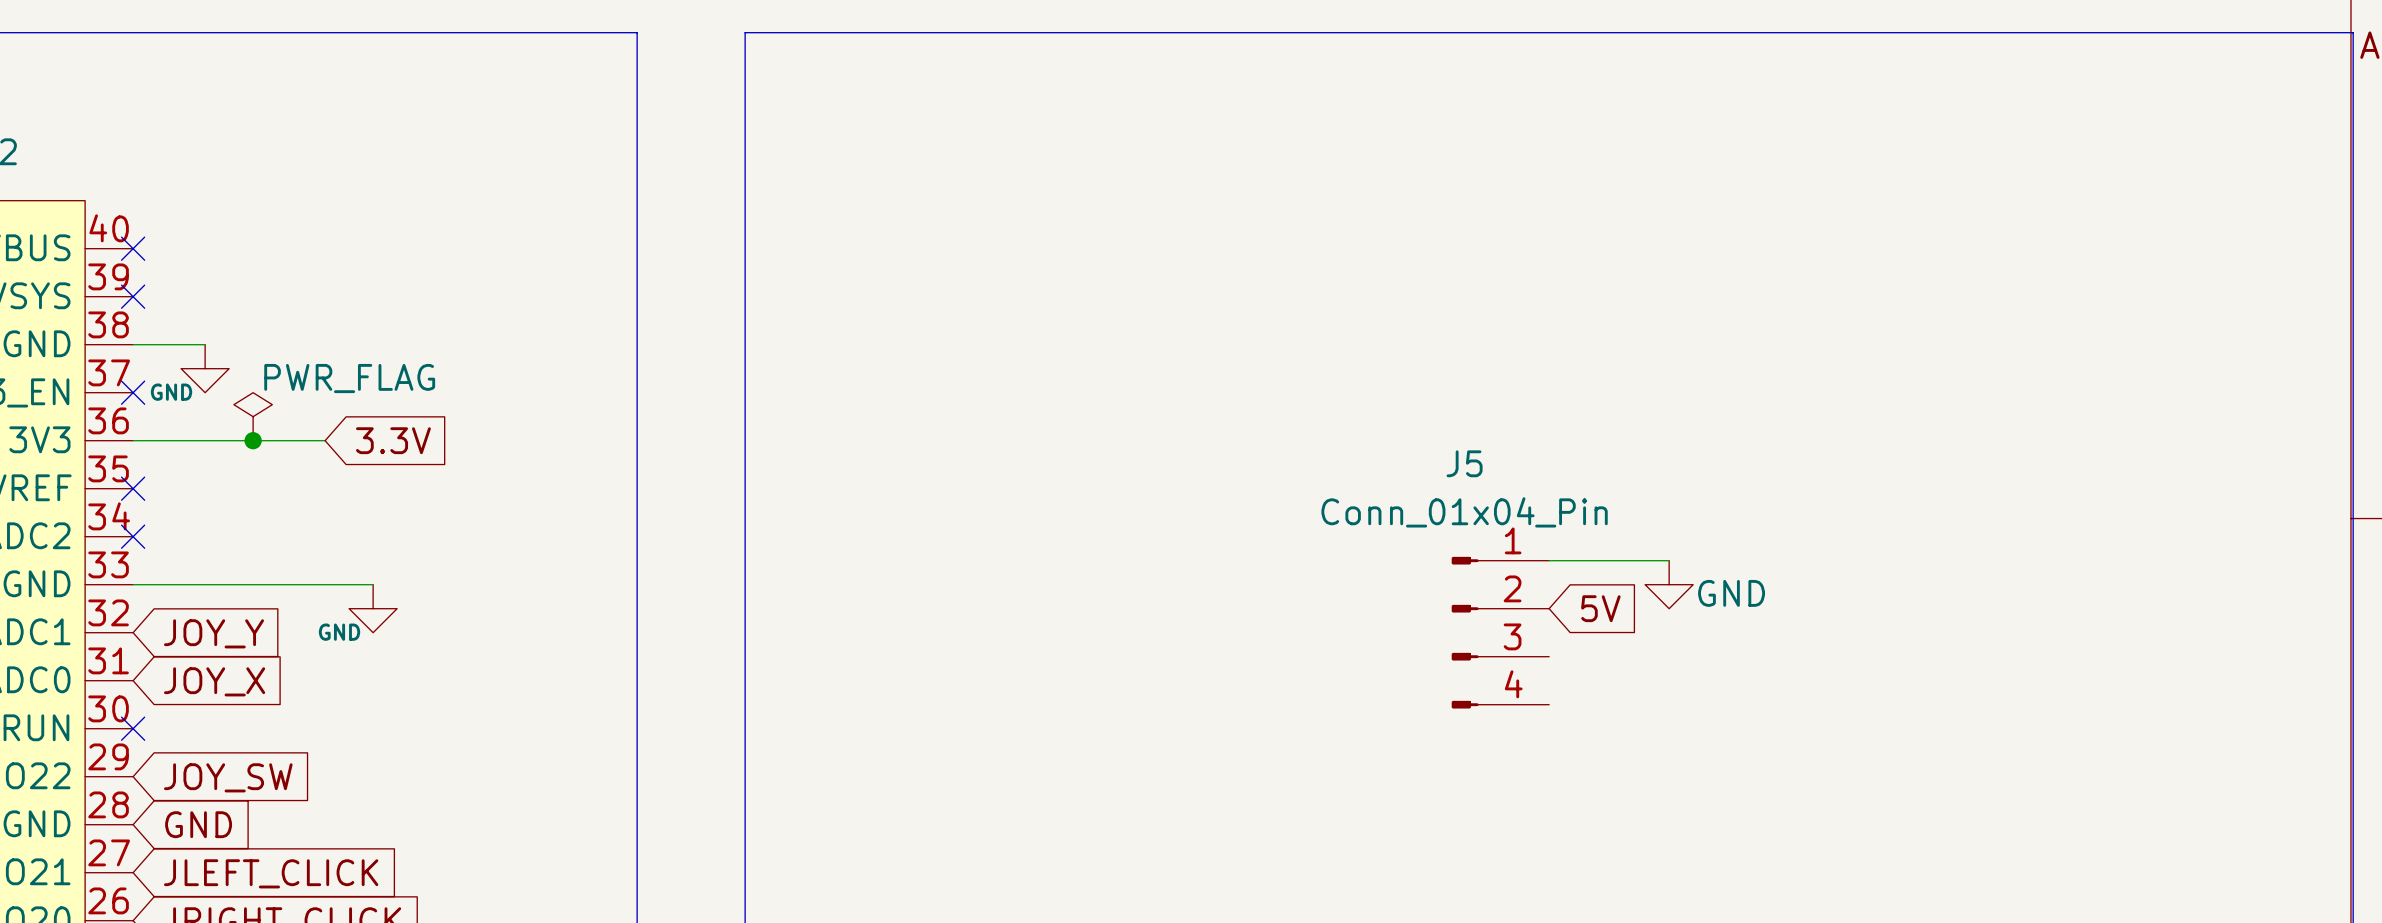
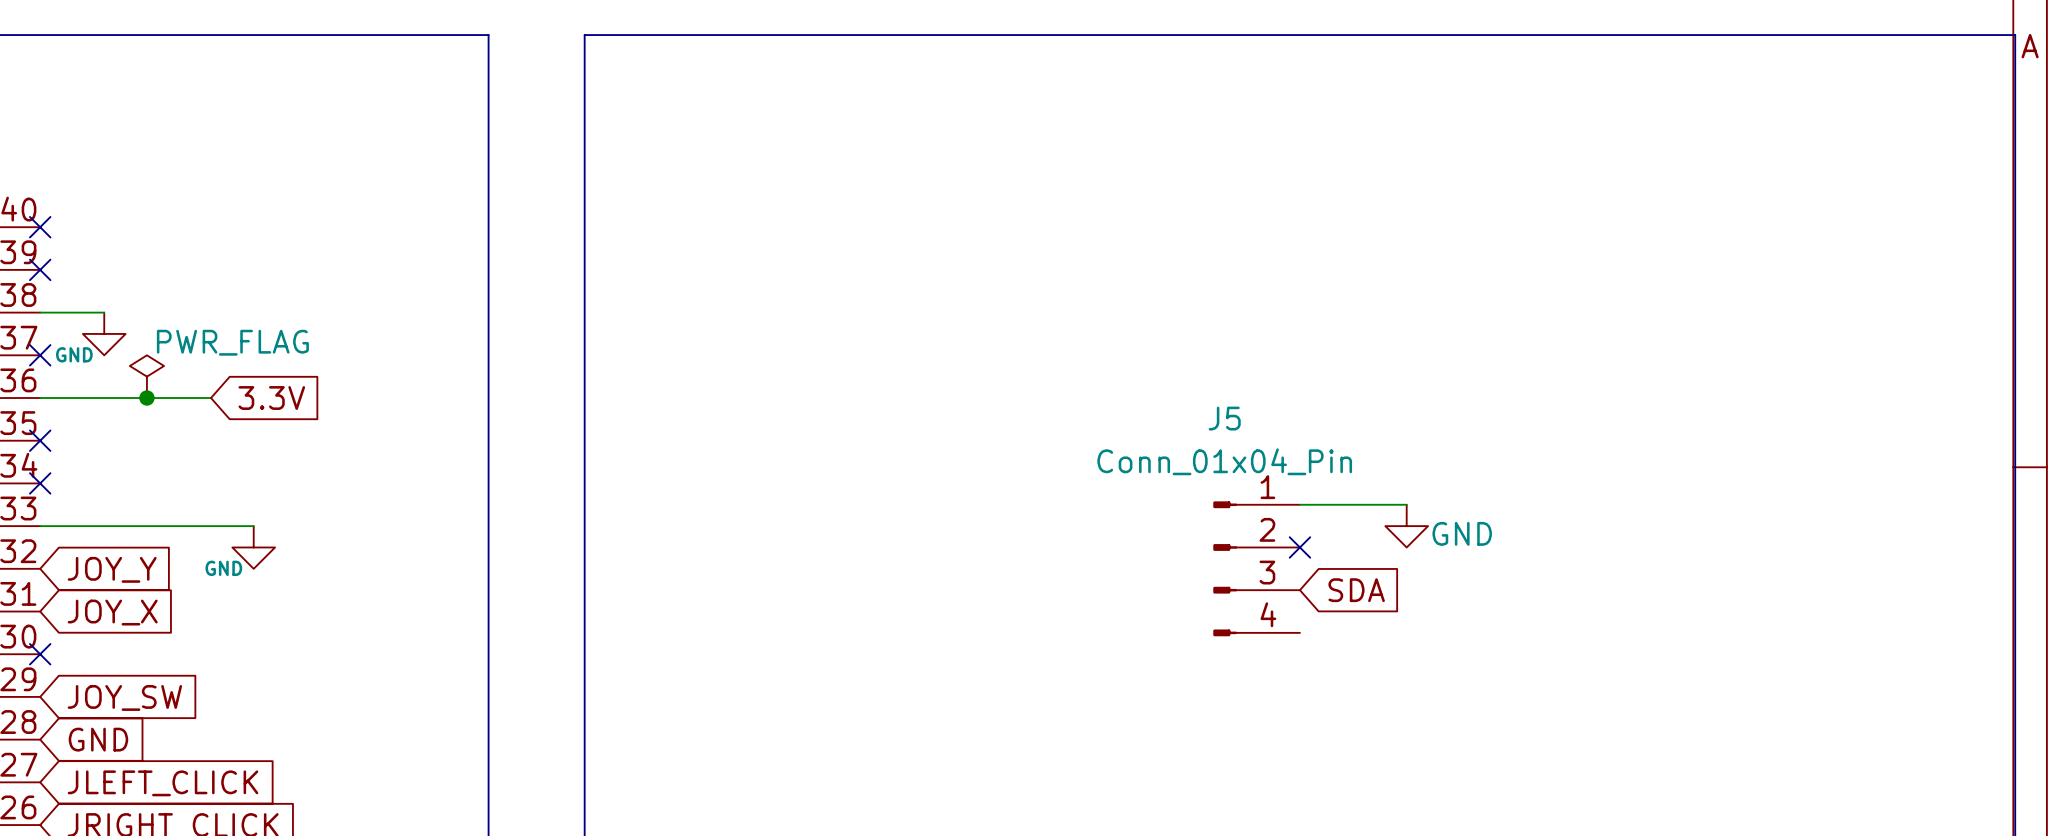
no-connect mark: none -> (1299, 547)
global label: 5V (1600, 608) -> none
global label: none -> SDA (1356, 590)

